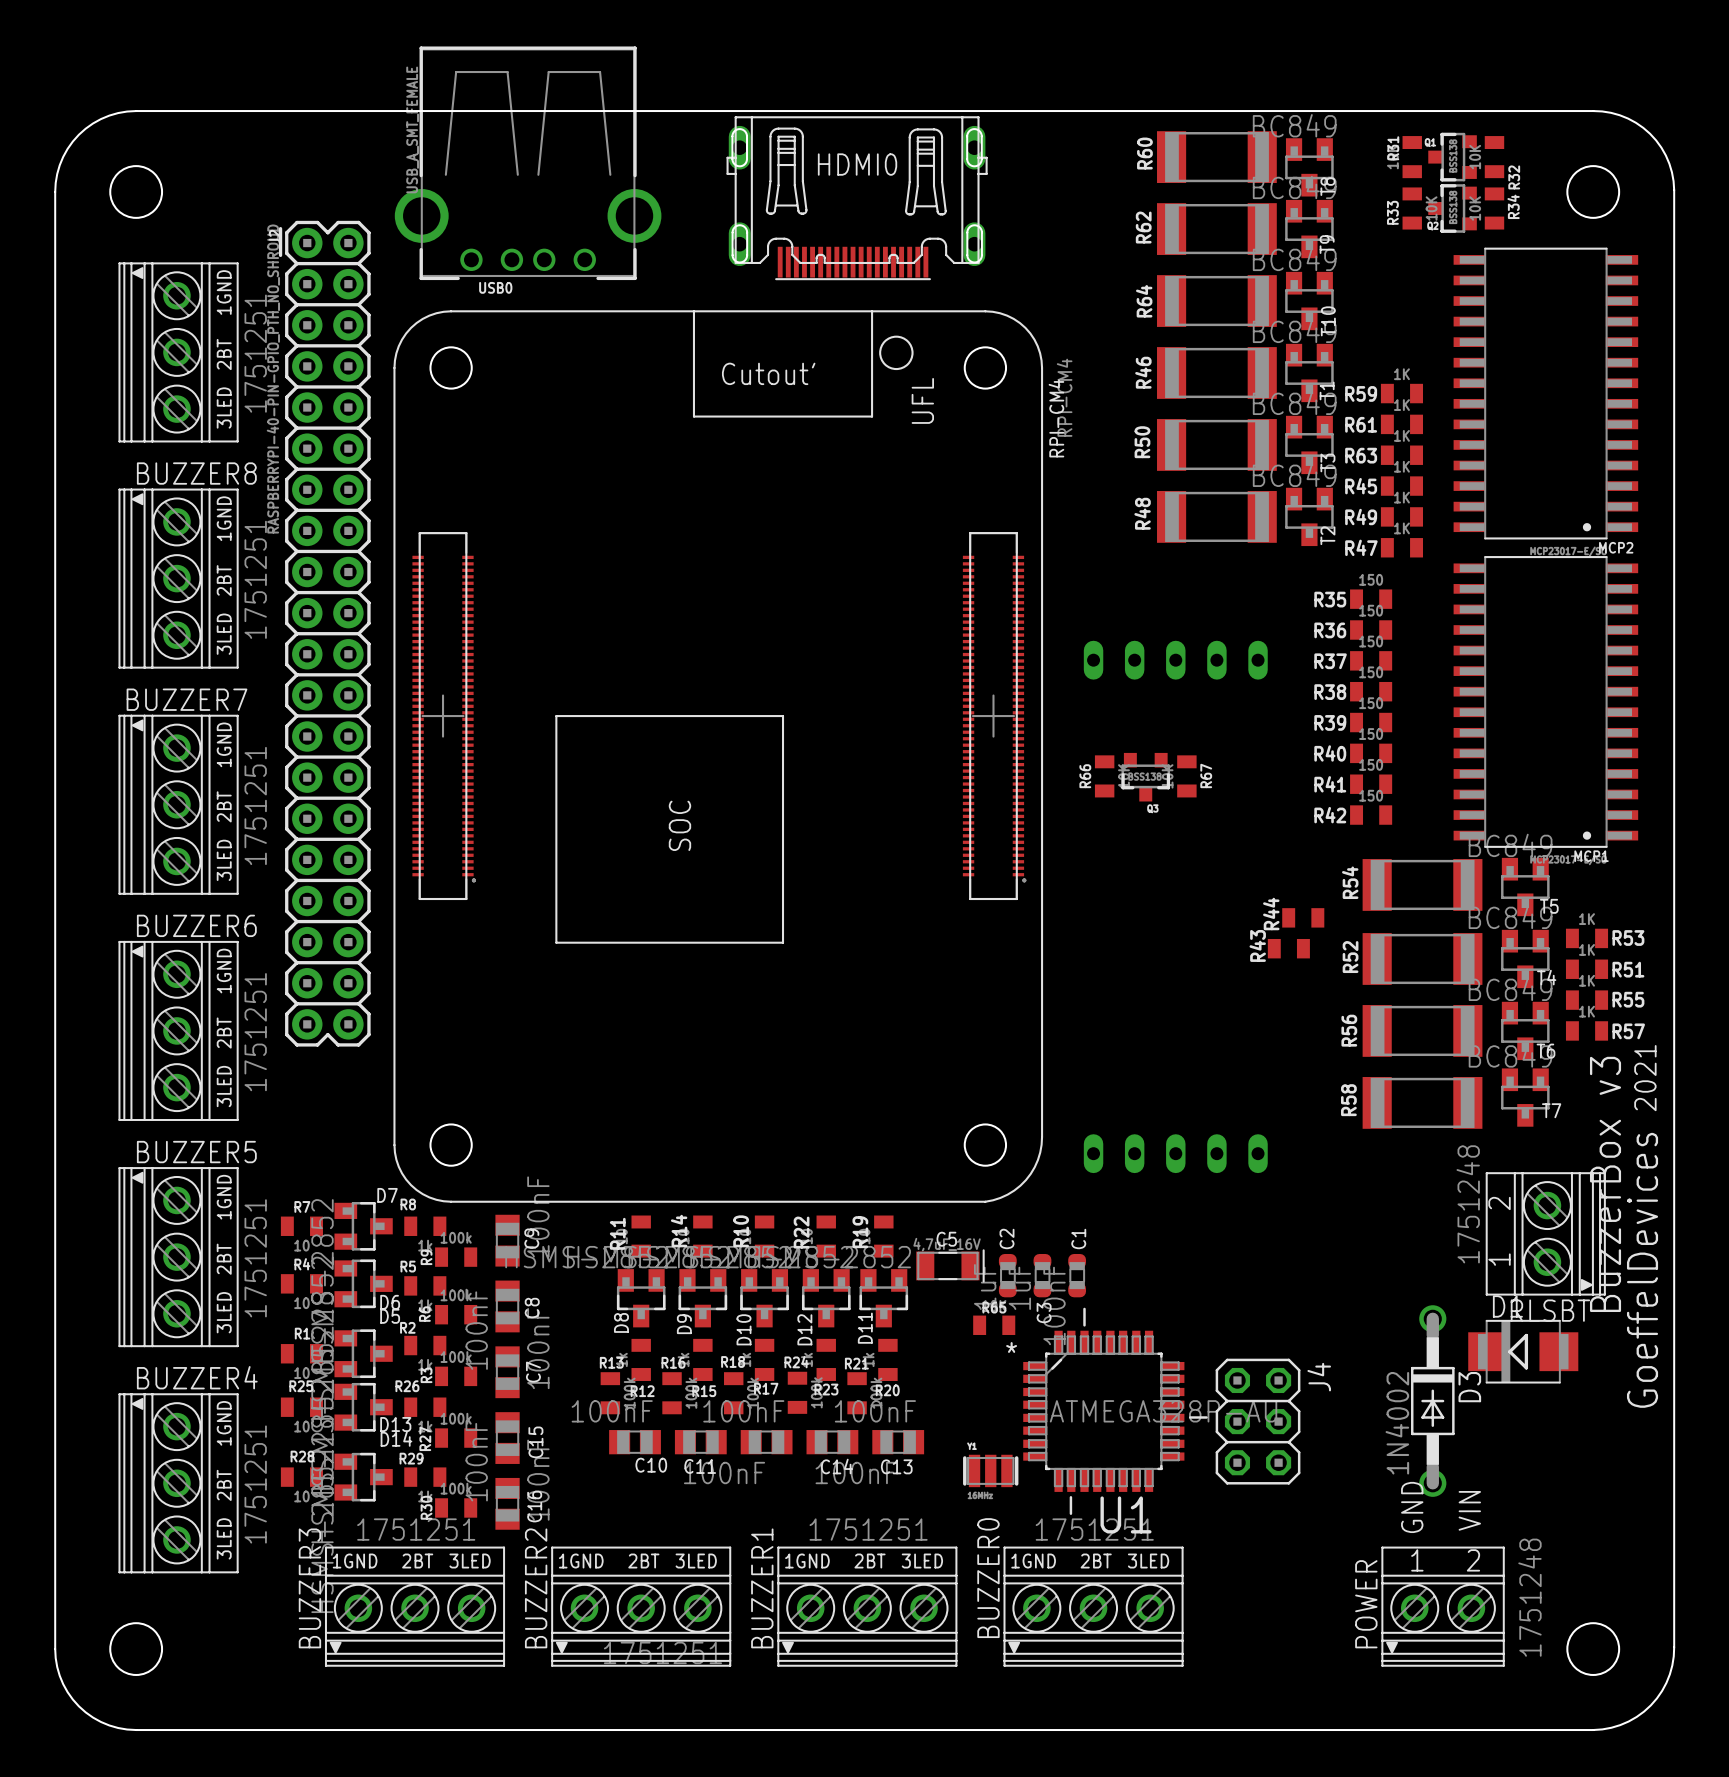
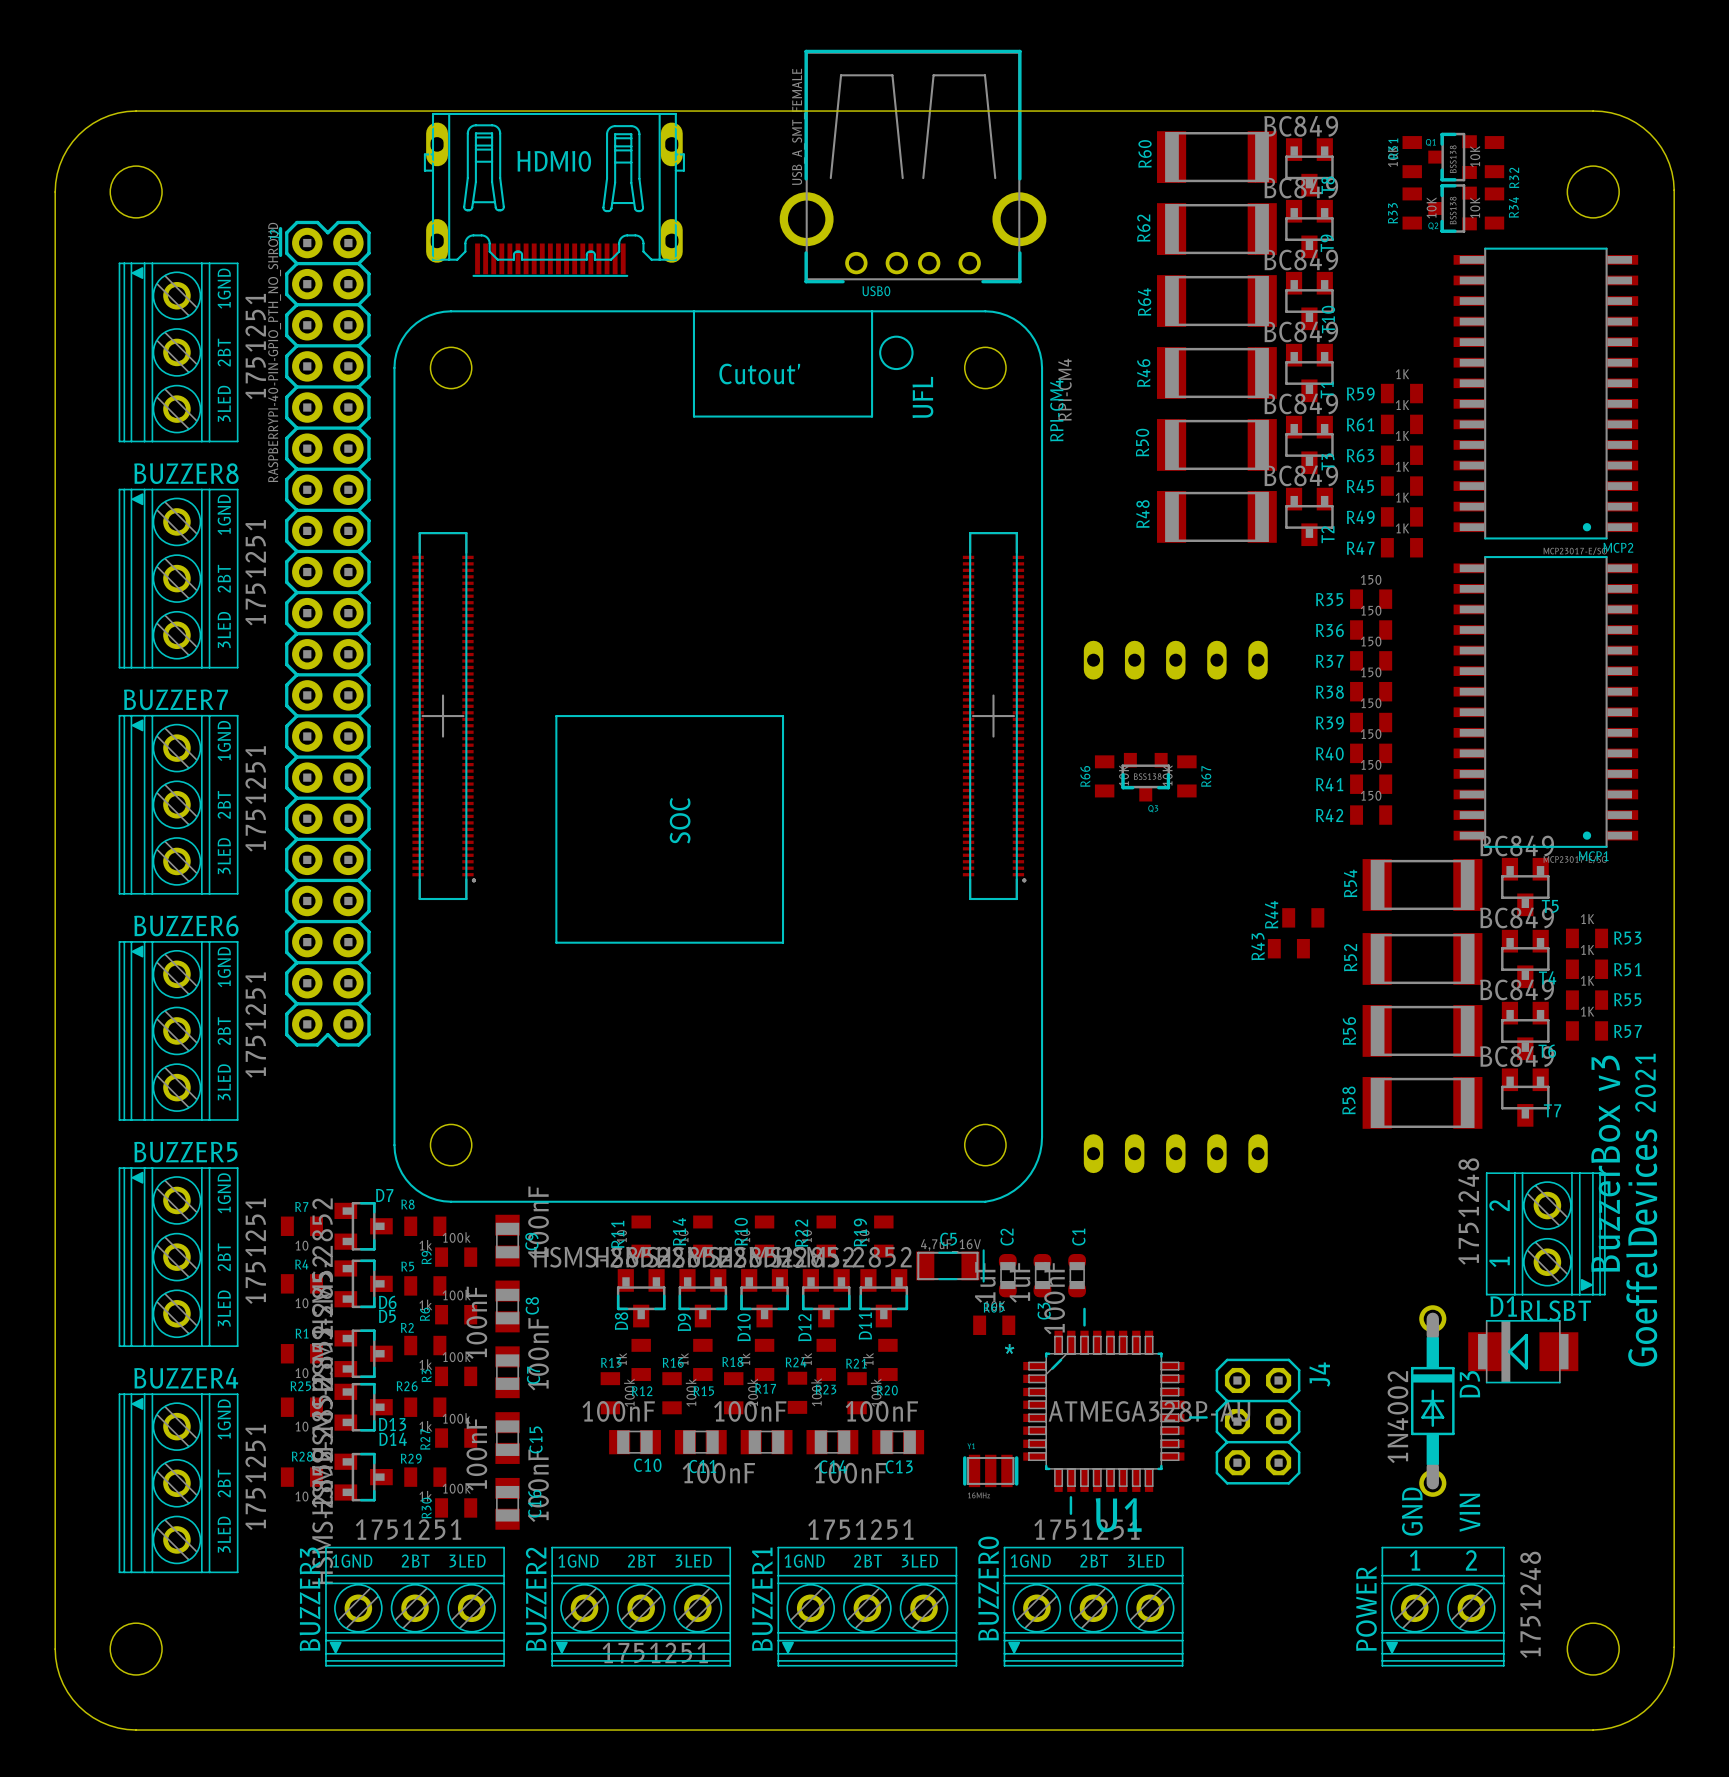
USB0 position: (528, 163) -> (913, 166)
HDMI0 position: (857, 198) -> (554, 194)

